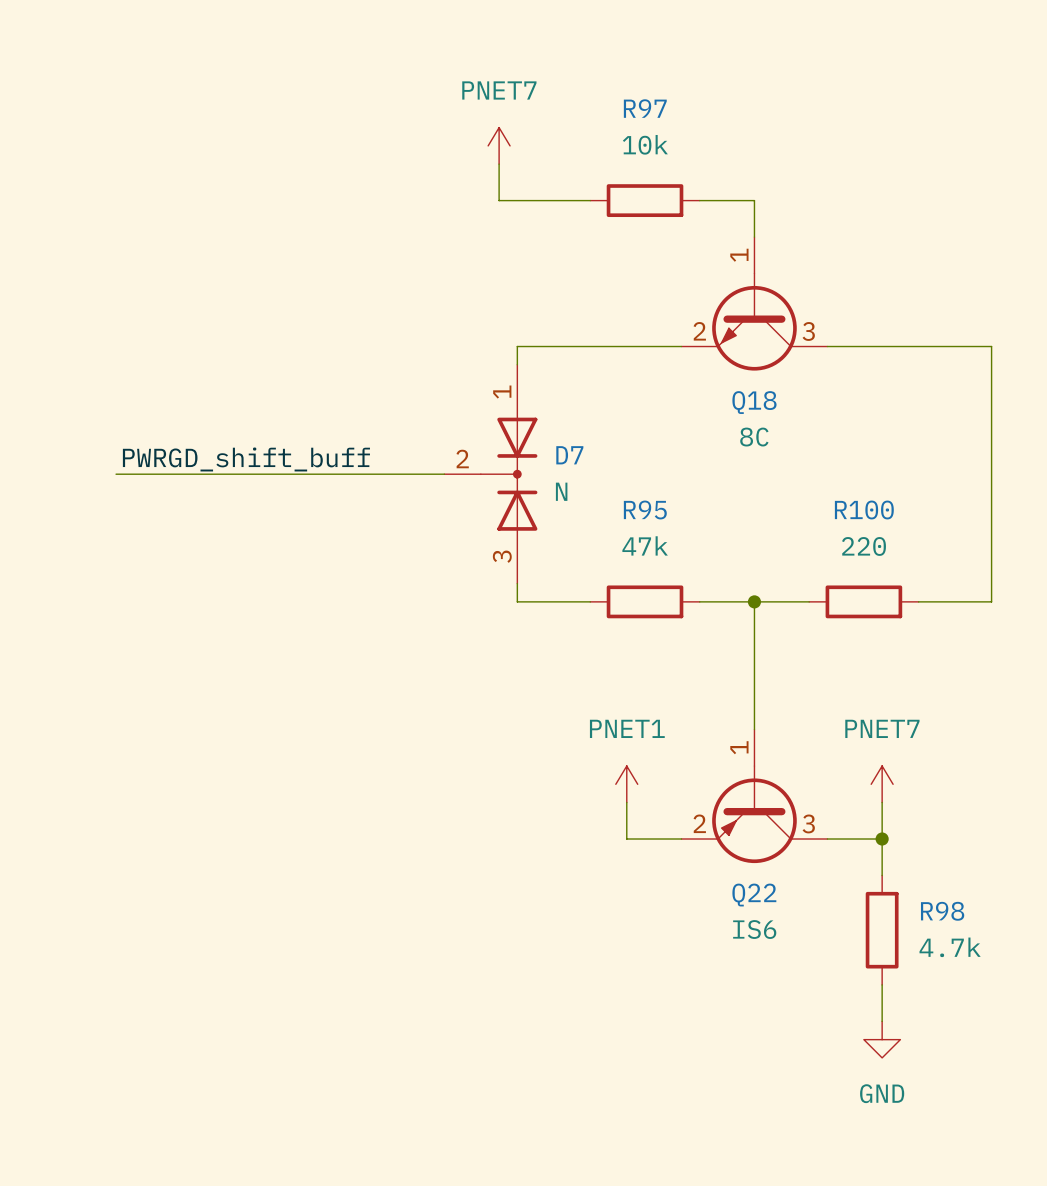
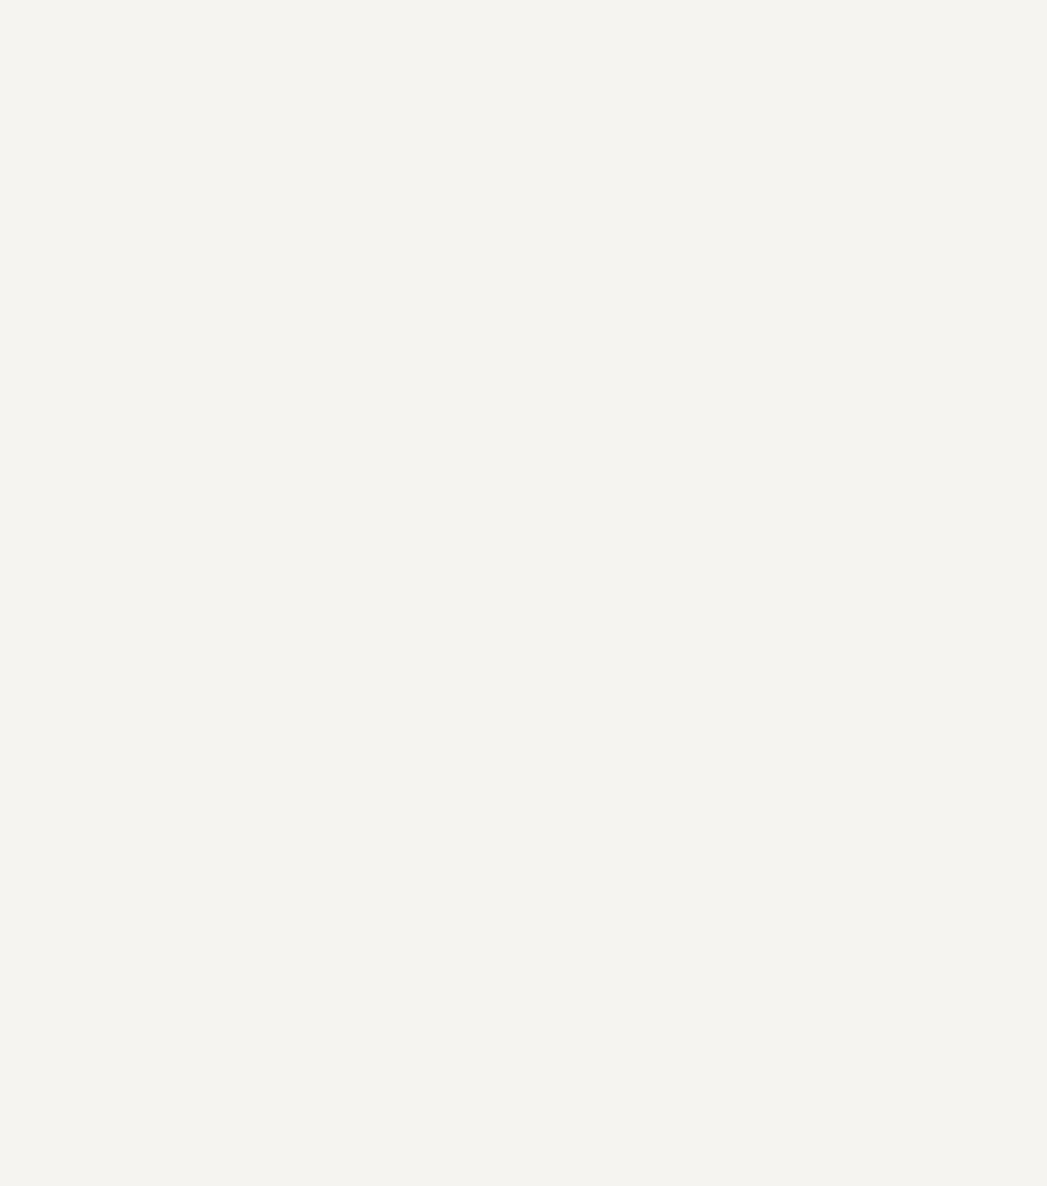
power symbol: PNET7 (499, 145) -> none
wire: (499, 164) (499, 200) (590, 200) -> none
R97: 10k (645, 200) -> none
wire: (699, 200) (754, 200) (754, 237) -> none
Q18: 8C (754, 303) -> none
wire: (681, 346) (517, 346) (517, 364) -> none
wire: (827, 346) (991, 346) (991, 601) (918, 601) -> none
label: PWRGD_shift_buff (246, 459) -> none
wire: (116, 474) (444, 474) -> none
D7: N (490, 474) -> none
wire: (517, 583) (517, 601) (590, 601) -> none
R95: 47k (645, 601) -> none
wire: (699, 601) (809, 601) -> none
wire: (754, 601) (754, 729) -> none
junction: (754, 601) -> none
R100: 220 (863, 601) -> none
power symbol: PNET1 (626, 784) -> none
power symbol: PNET7 (882, 784) -> none
Q22: IS6 (754, 796) -> none
wire: (626, 802) (626, 839) (681, 839) -> none
wire: (882, 802) (882, 875) -> none
wire: (827, 839) (882, 839) -> none
junction: (882, 839) -> none
R98: 4.7k (882, 930) -> none
wire: (882, 984) (882, 1021) -> none
power symbol: GND (882, 1039) -> none

